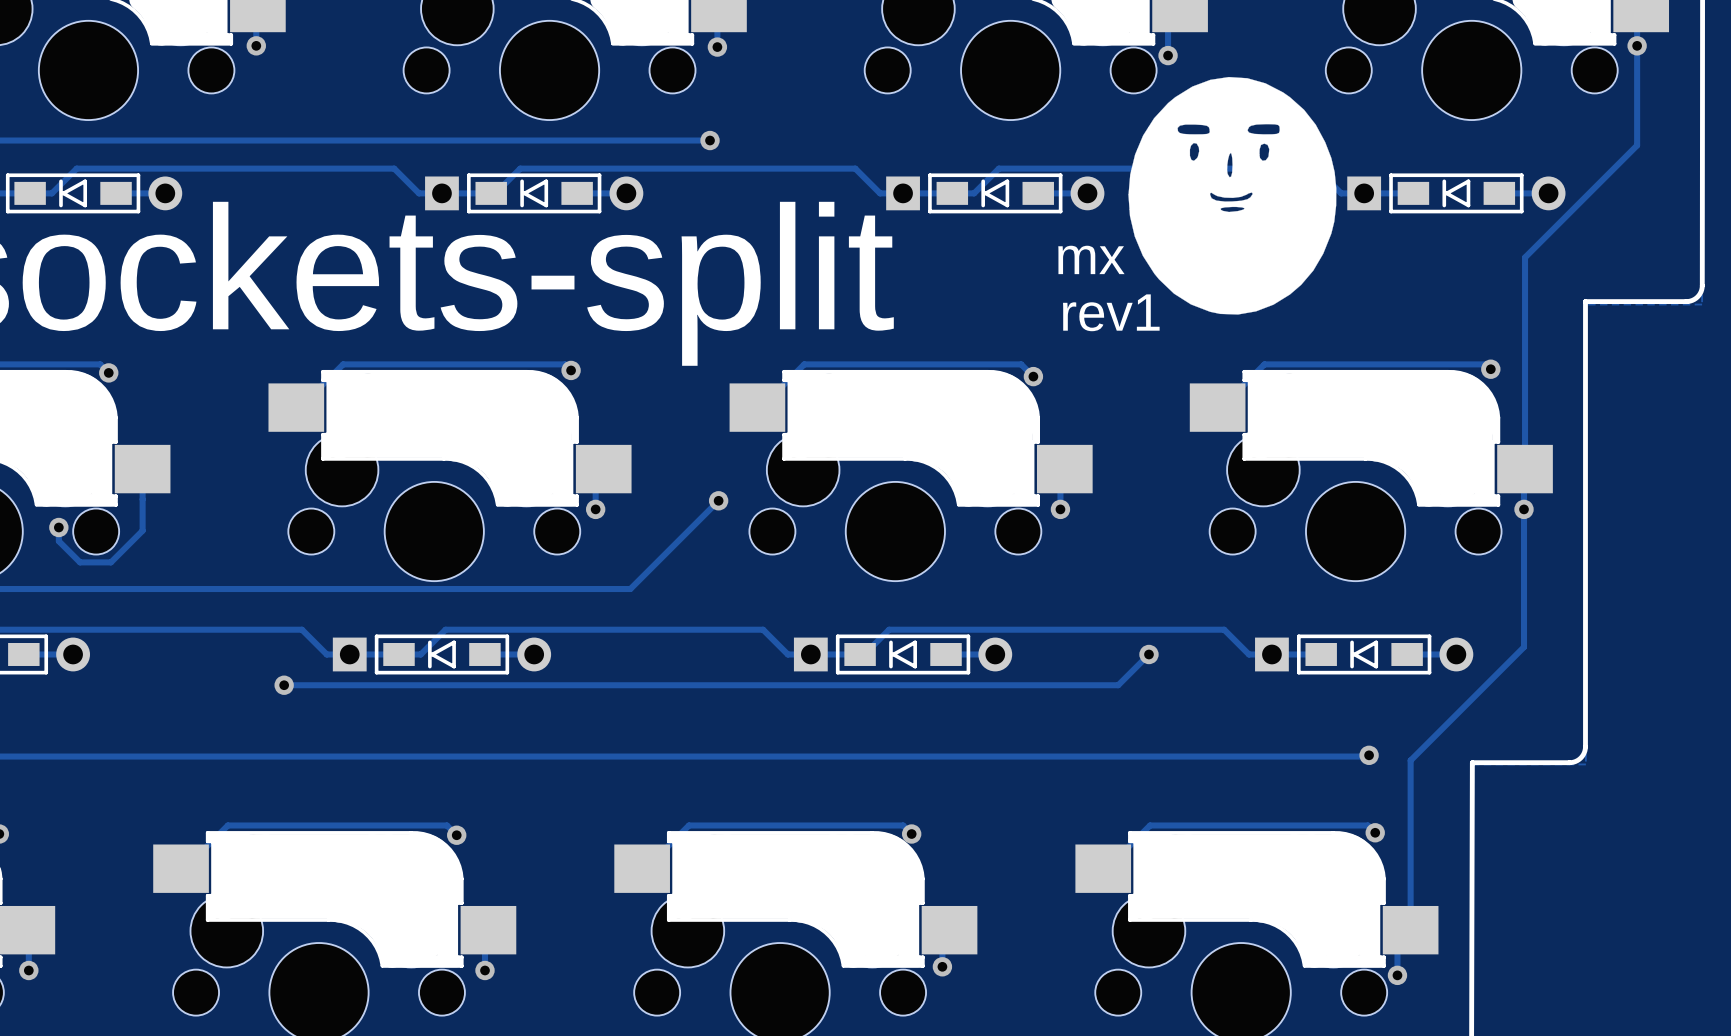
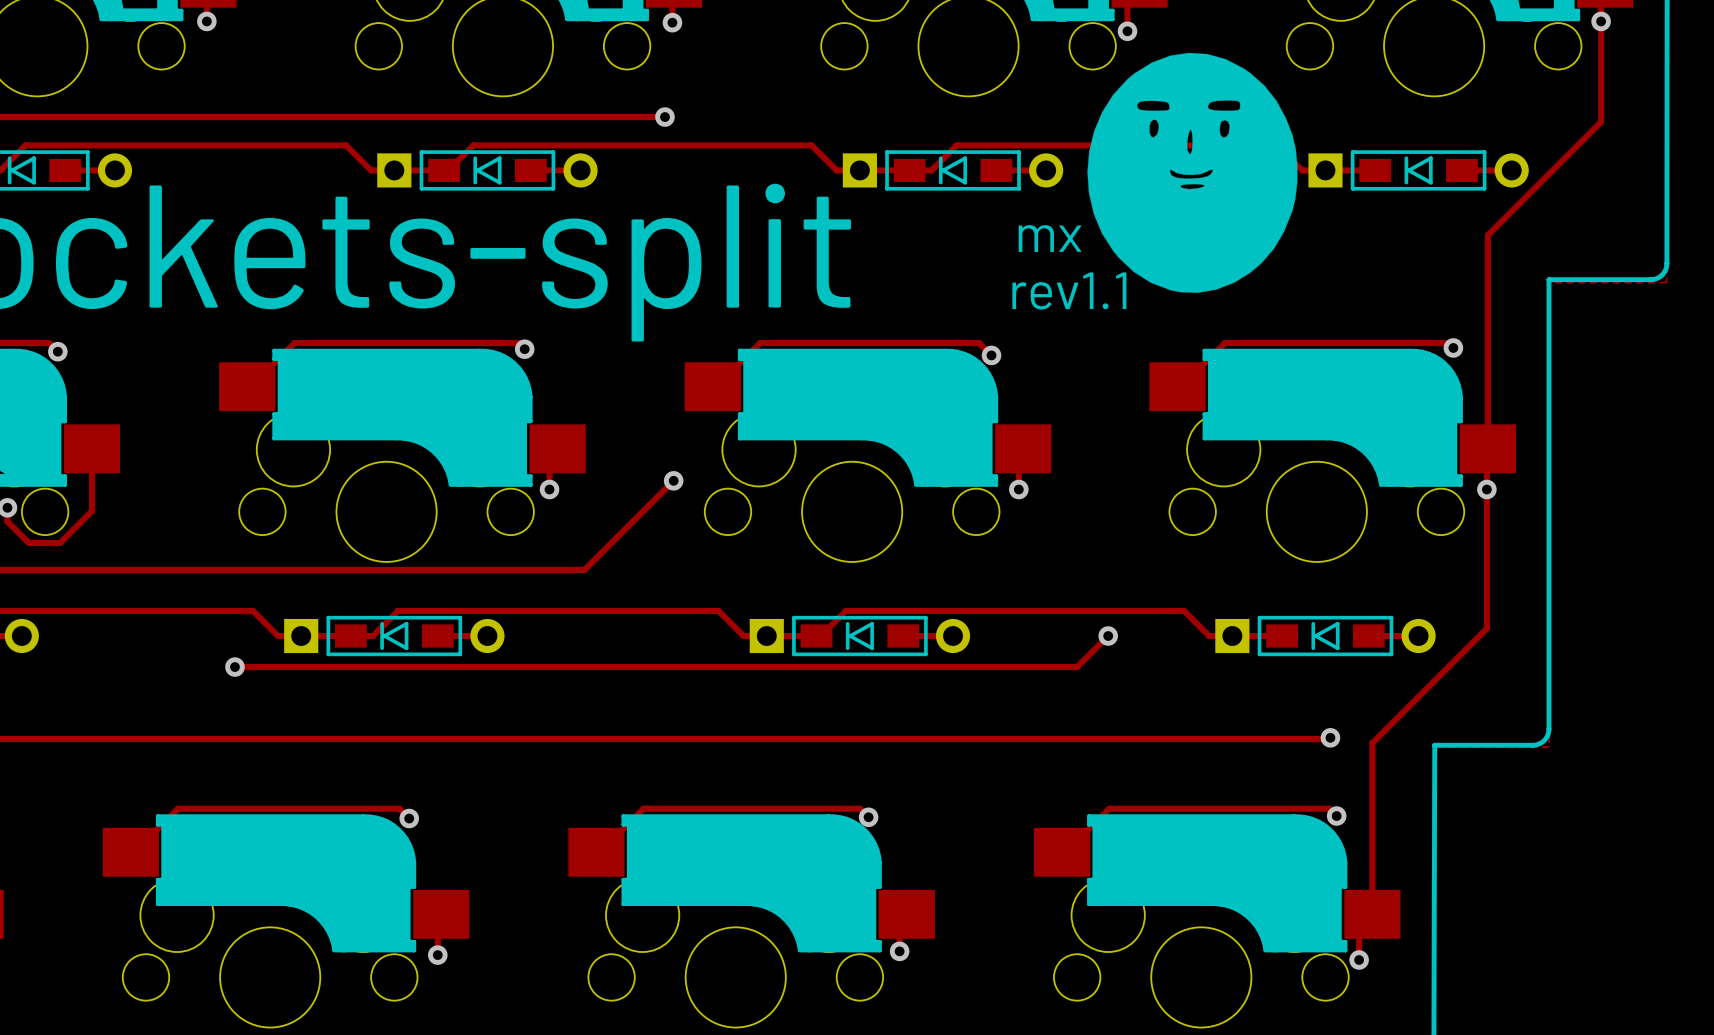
text: rev1 (1111, 312) -> rev1.1 (1069, 290)

